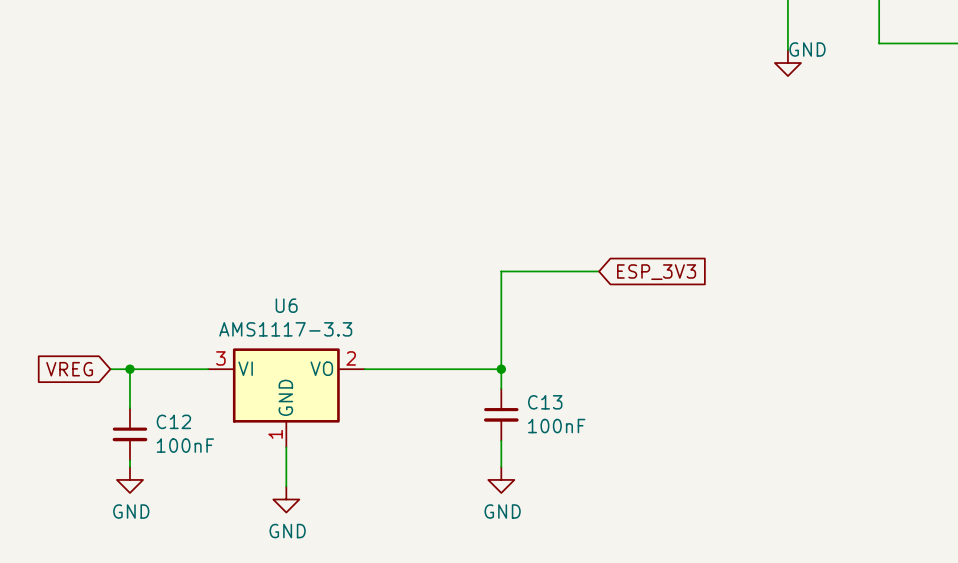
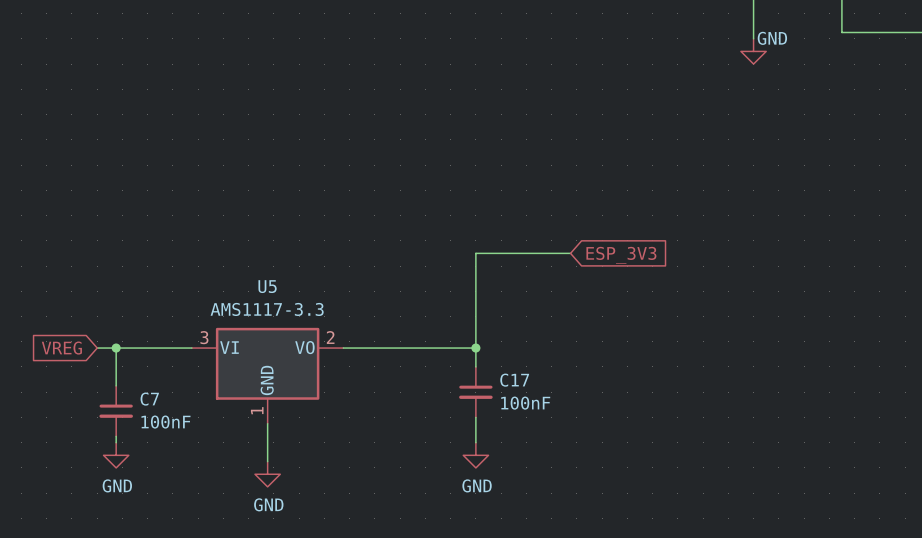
U6 name: U6 (286, 305) -> U5 (267, 286)
C13 name: C13 (545, 402) -> C17 (514, 380)
C12 name: C12 (173, 421) -> C7 (149, 399)

